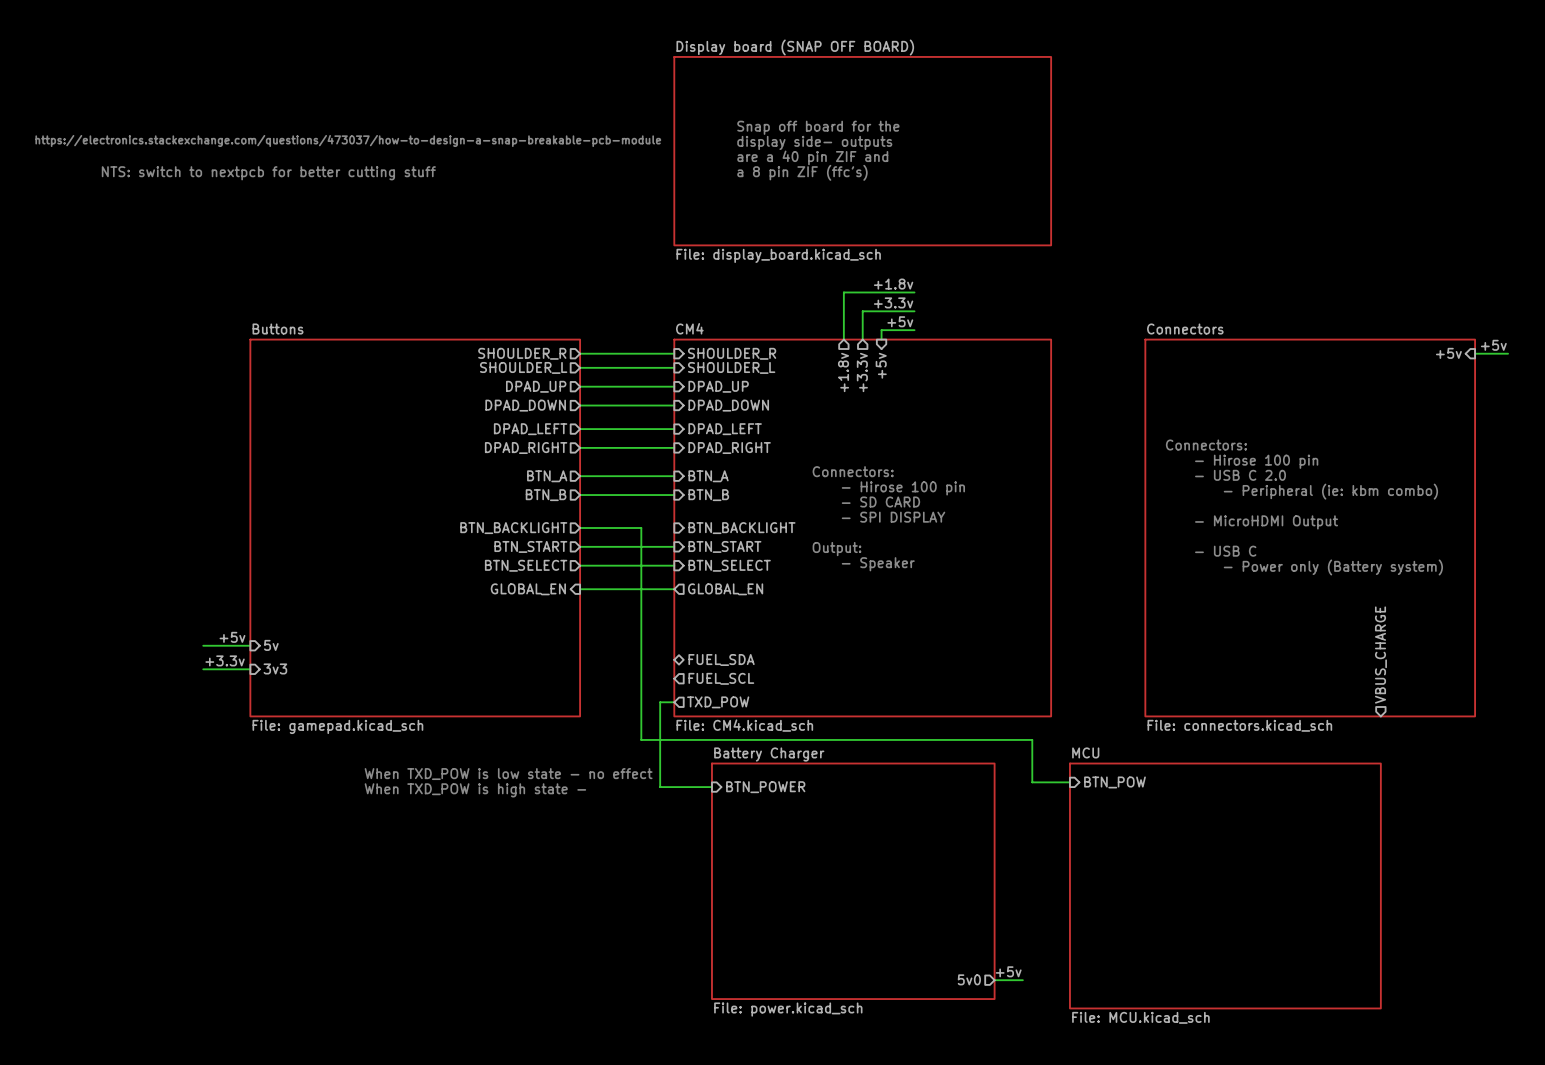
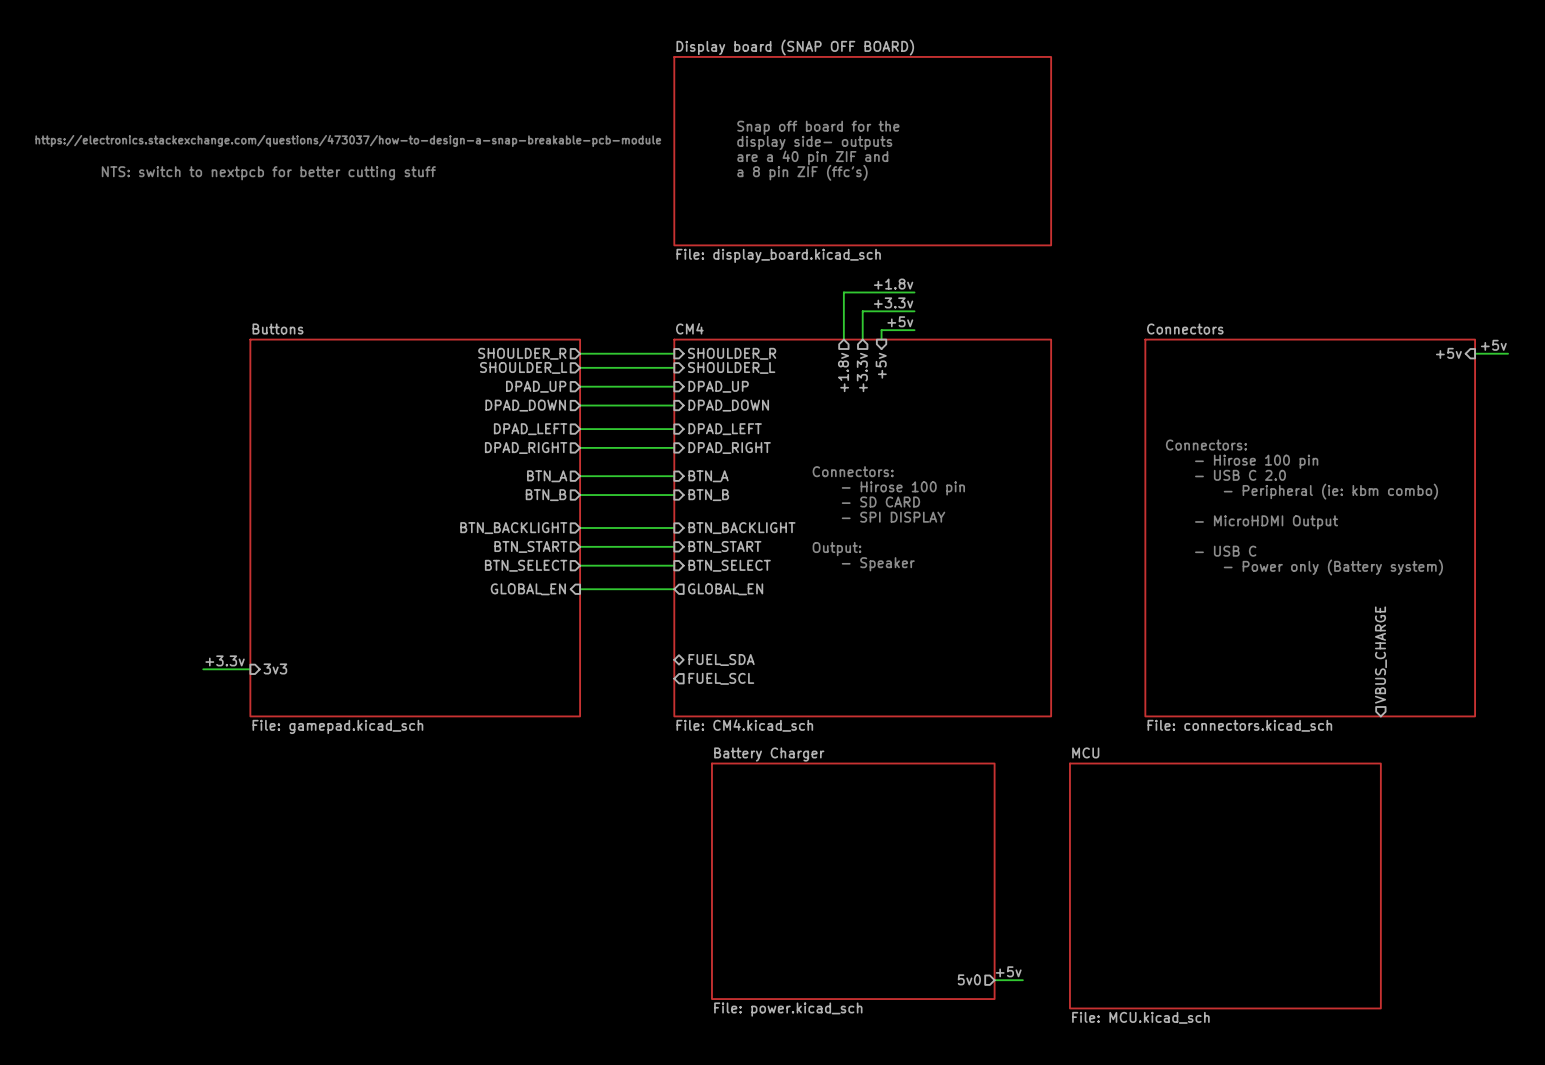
wire: (641, 528) (641, 739) (1032, 739) (1032, 782) (1069, 782) -> (641, 528) (674, 528)
label: +5v (232, 637) -> none
wire: (203, 645) (250, 645) -> none
sheet pin: 5v (271, 645) -> none
wire: (674, 702) (660, 702) (660, 787) (711, 787) -> none
sheet pin: TXD_POW (718, 702) -> none
text: When TXD_POW is low state - no effect (508, 774) -> none
sheet pin: BTN_POW (1114, 782) -> none
sheet pin: BTN_POWER (765, 787) -> none
text: When TXD_POW is high state - (475, 790) -> none

